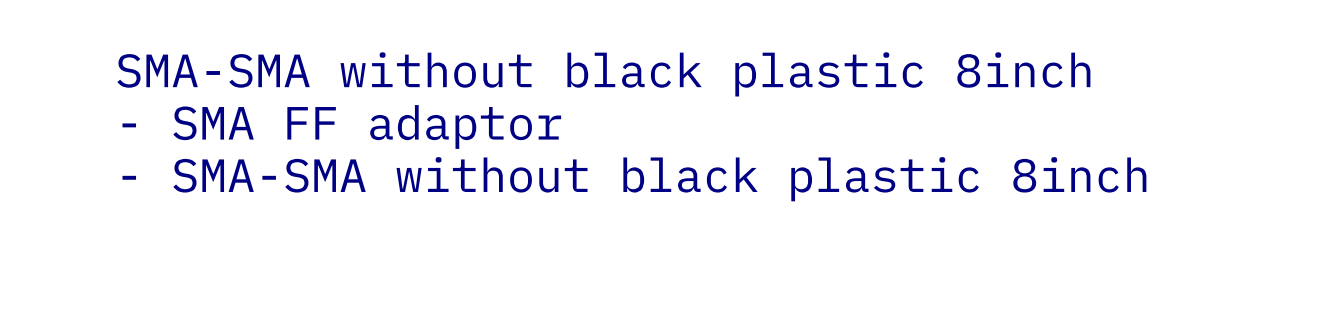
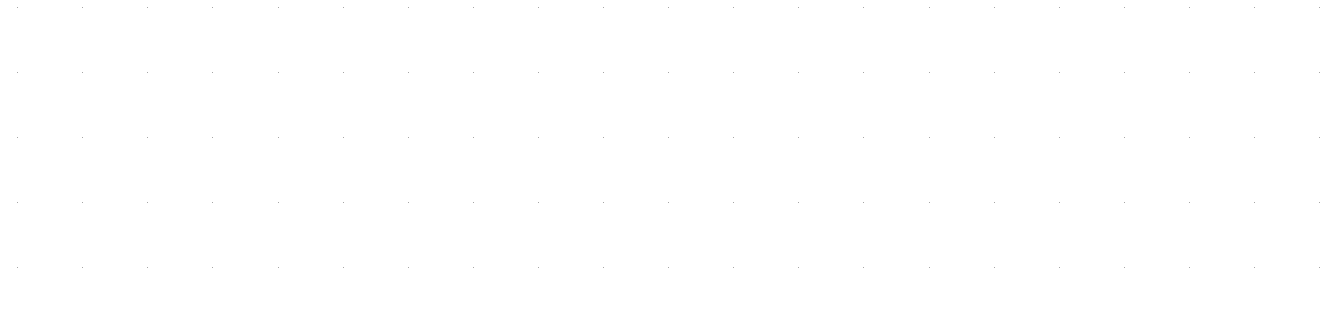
text: SMA-SMA without black plastic 8inch (603, 74) -> none
text: - SMA FF adaptor (341, 126) -> none
text: - SMA-SMA without black plastic 8inch (634, 179) -> none

